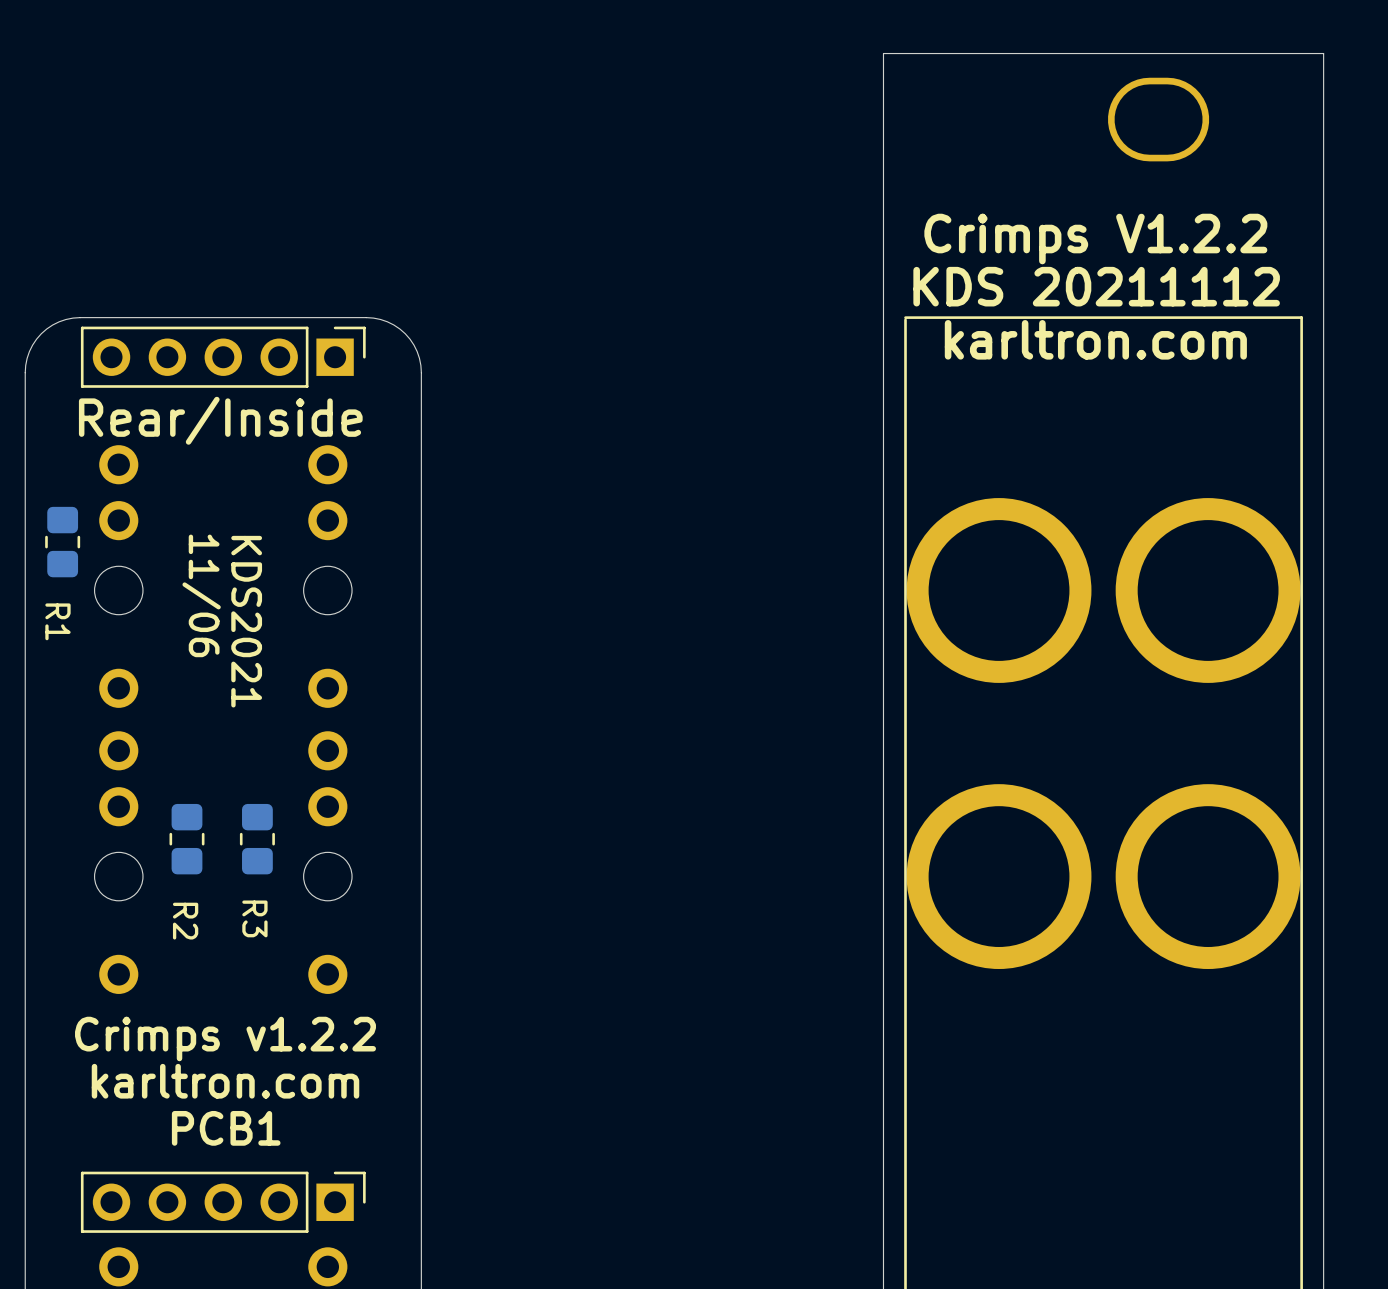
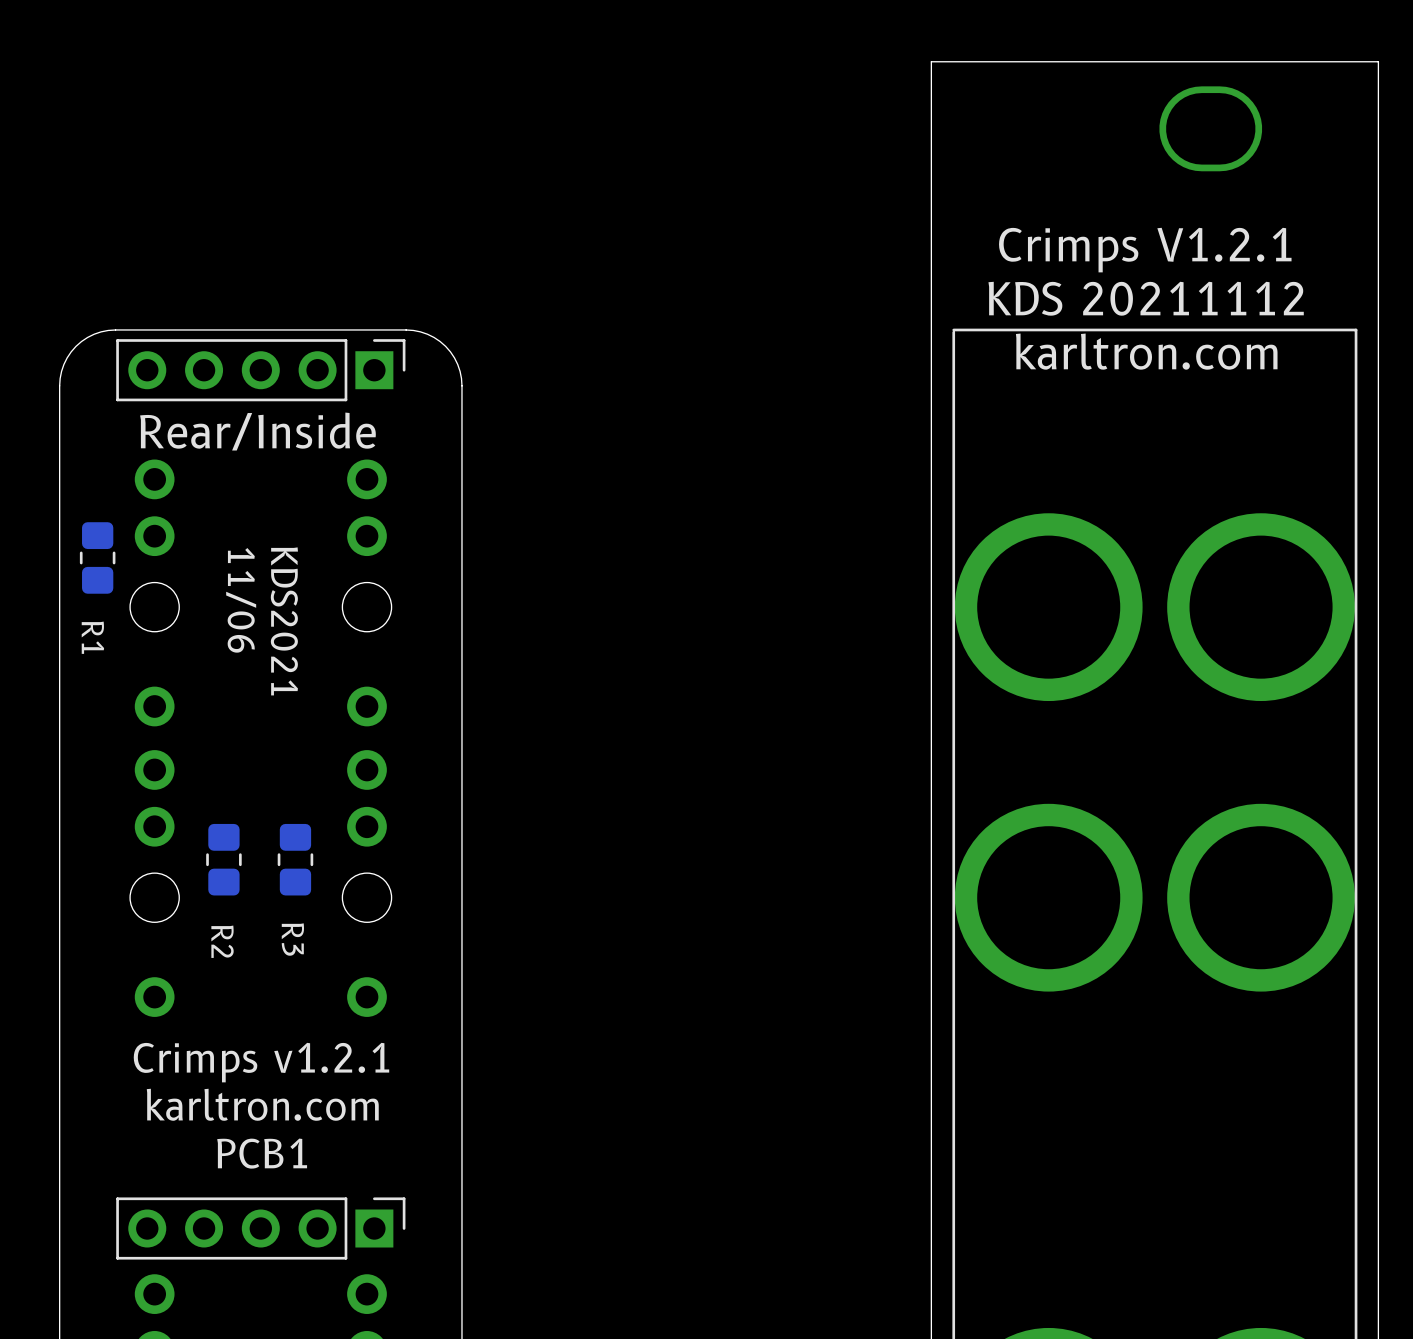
text: Crimps V1.2.2 (1095, 239) -> Crimps V1.2.1 (1145, 250)
text: Crimps v1.2.2 (225, 1038) -> Crimps v1.2.1 (261, 1062)

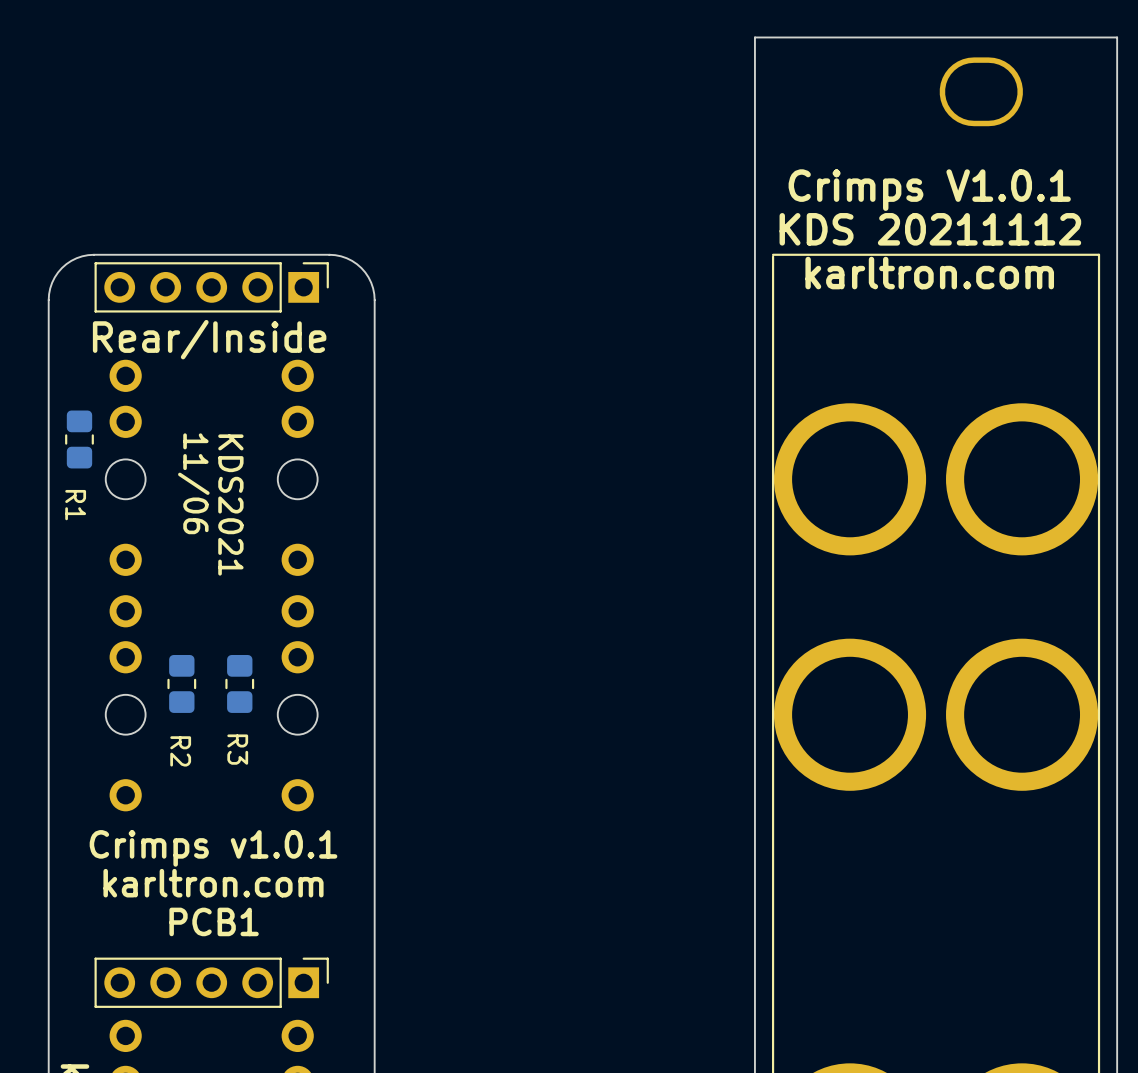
text: Crimps V1.2.1 (1145, 250) -> Crimps V1.0.1 (929, 190)
text: Crimps v1.2.1 (261, 1062) -> Crimps v1.0.1 (213, 848)

